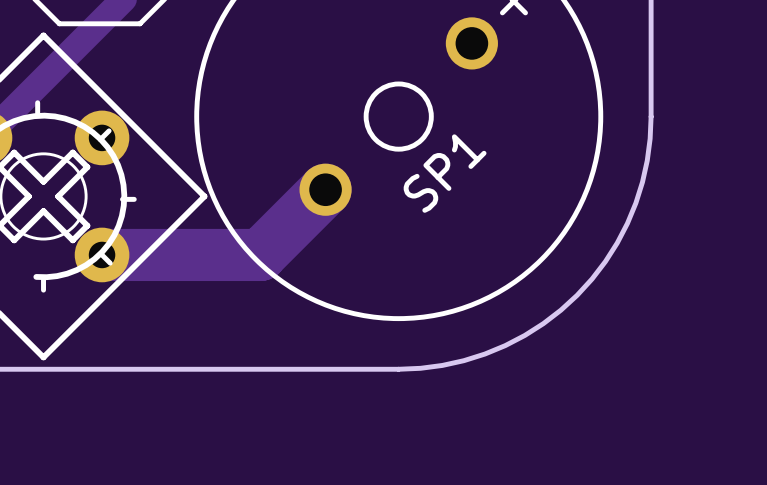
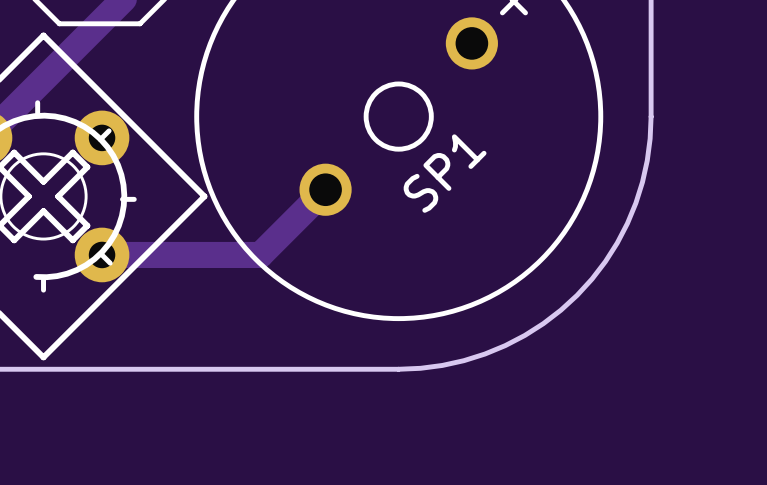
track width: thick (325, 189) (260, 254) (102, 254) -> thin (325, 189) (260, 254) (102, 254)

